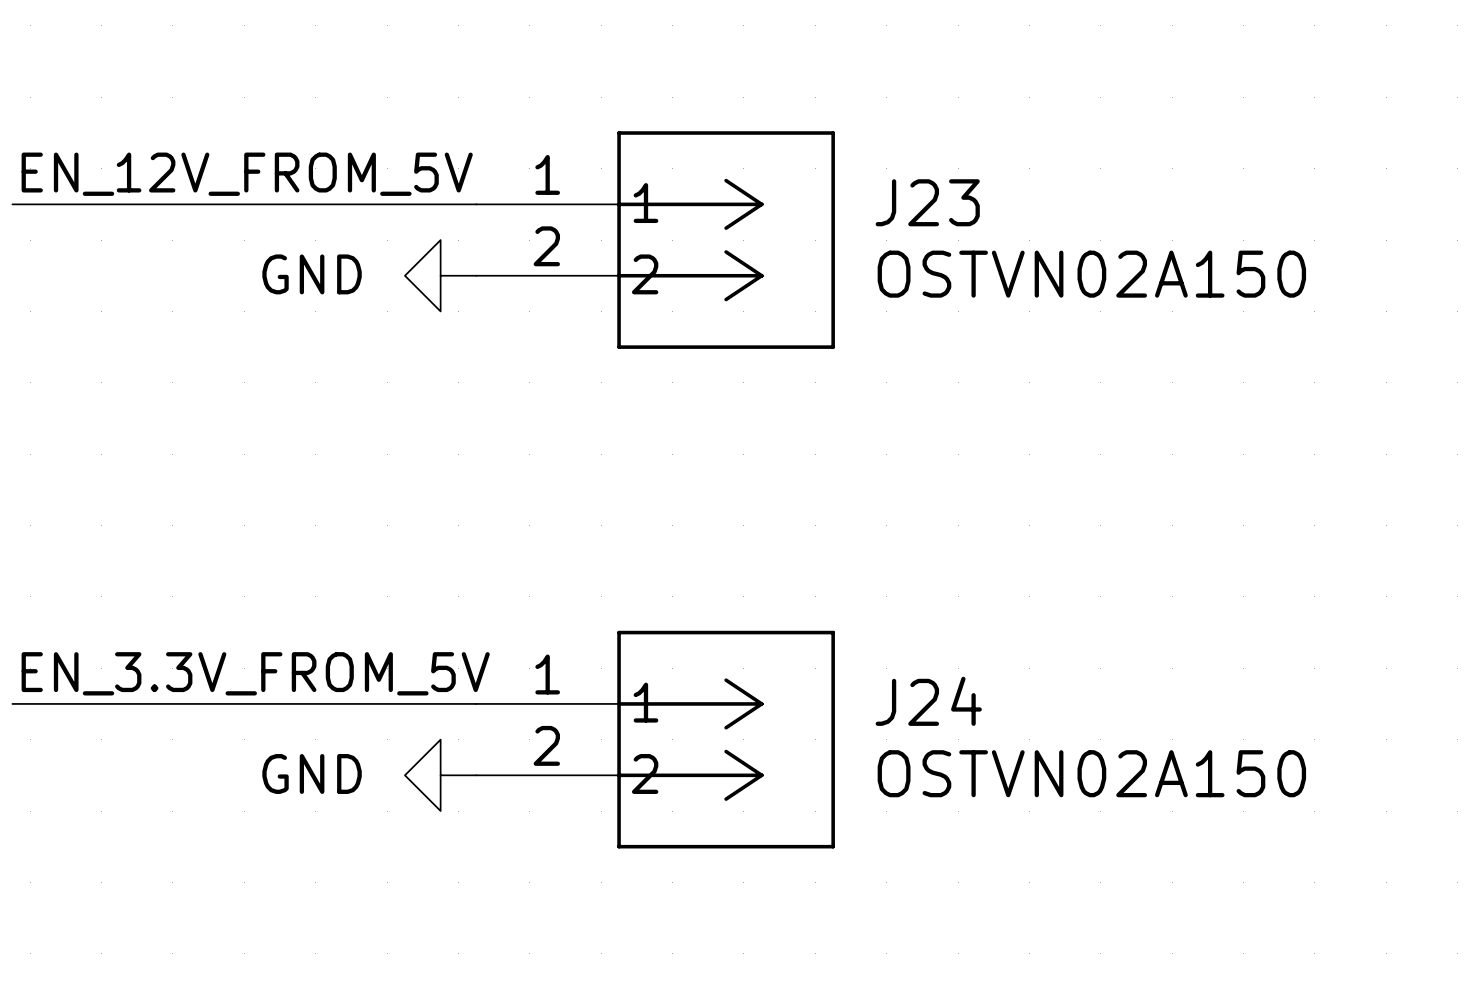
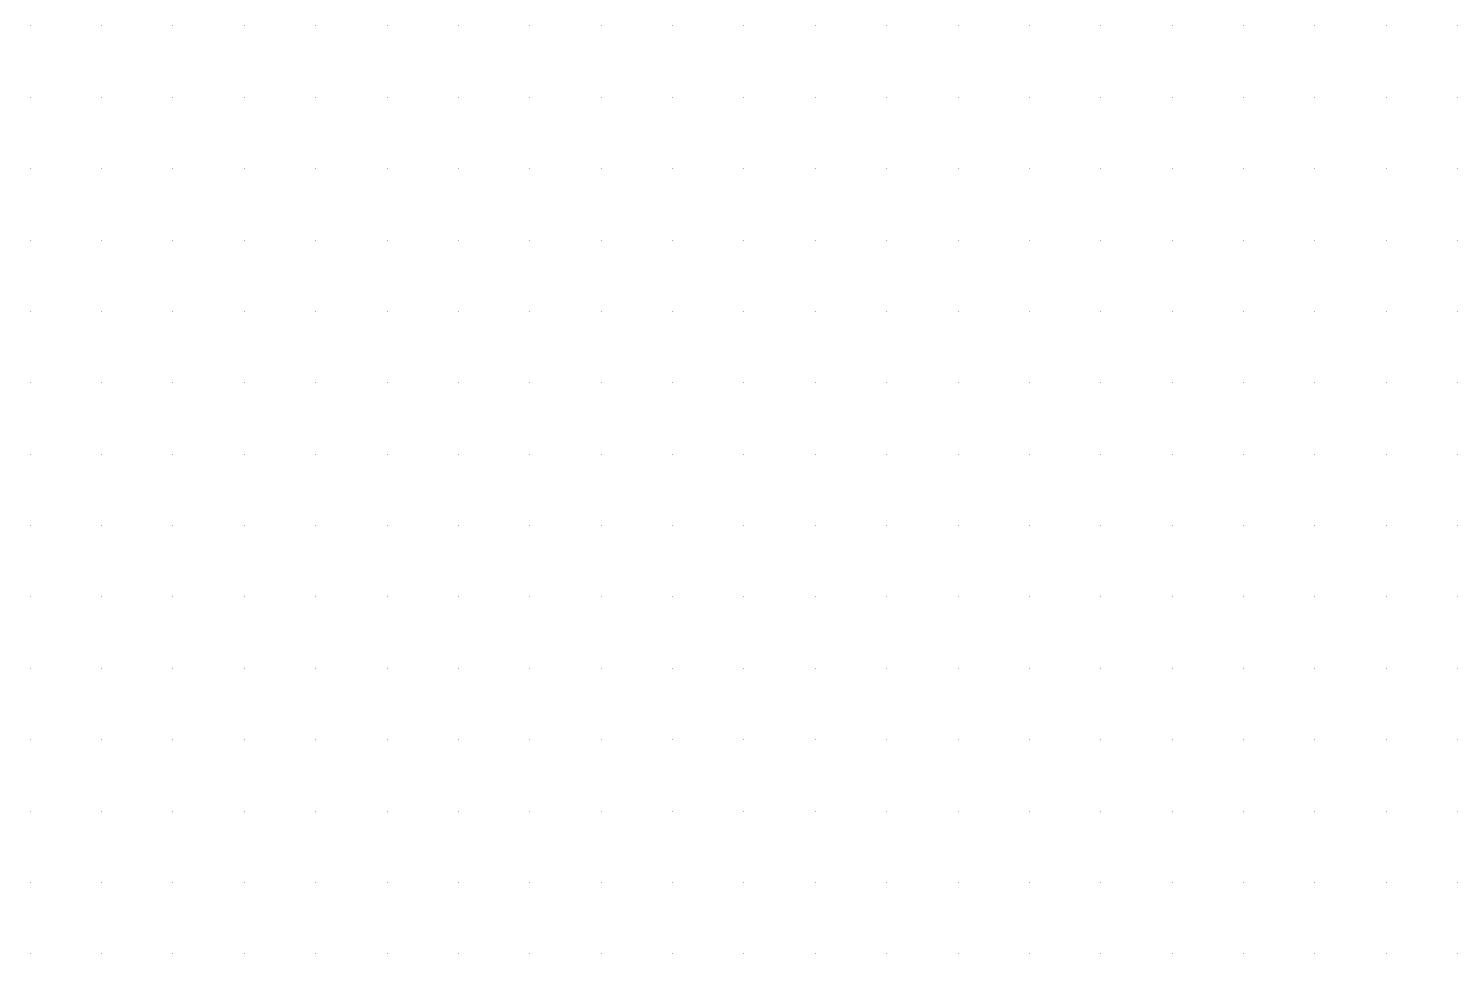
label: EN_12V_FROM_5V (247, 174) -> none
wire: (12, 204) (476, 204) -> none
J23: OSTVN02A150 (655, 240) -> none
power symbol: GND (440, 275) -> none
label: EN_3.3V_FROM_5V (255, 673) -> none
wire: (12, 703) (476, 703) -> none
J24: OSTVN02A150 (655, 739) -> none
power symbol: GND (440, 775) -> none

